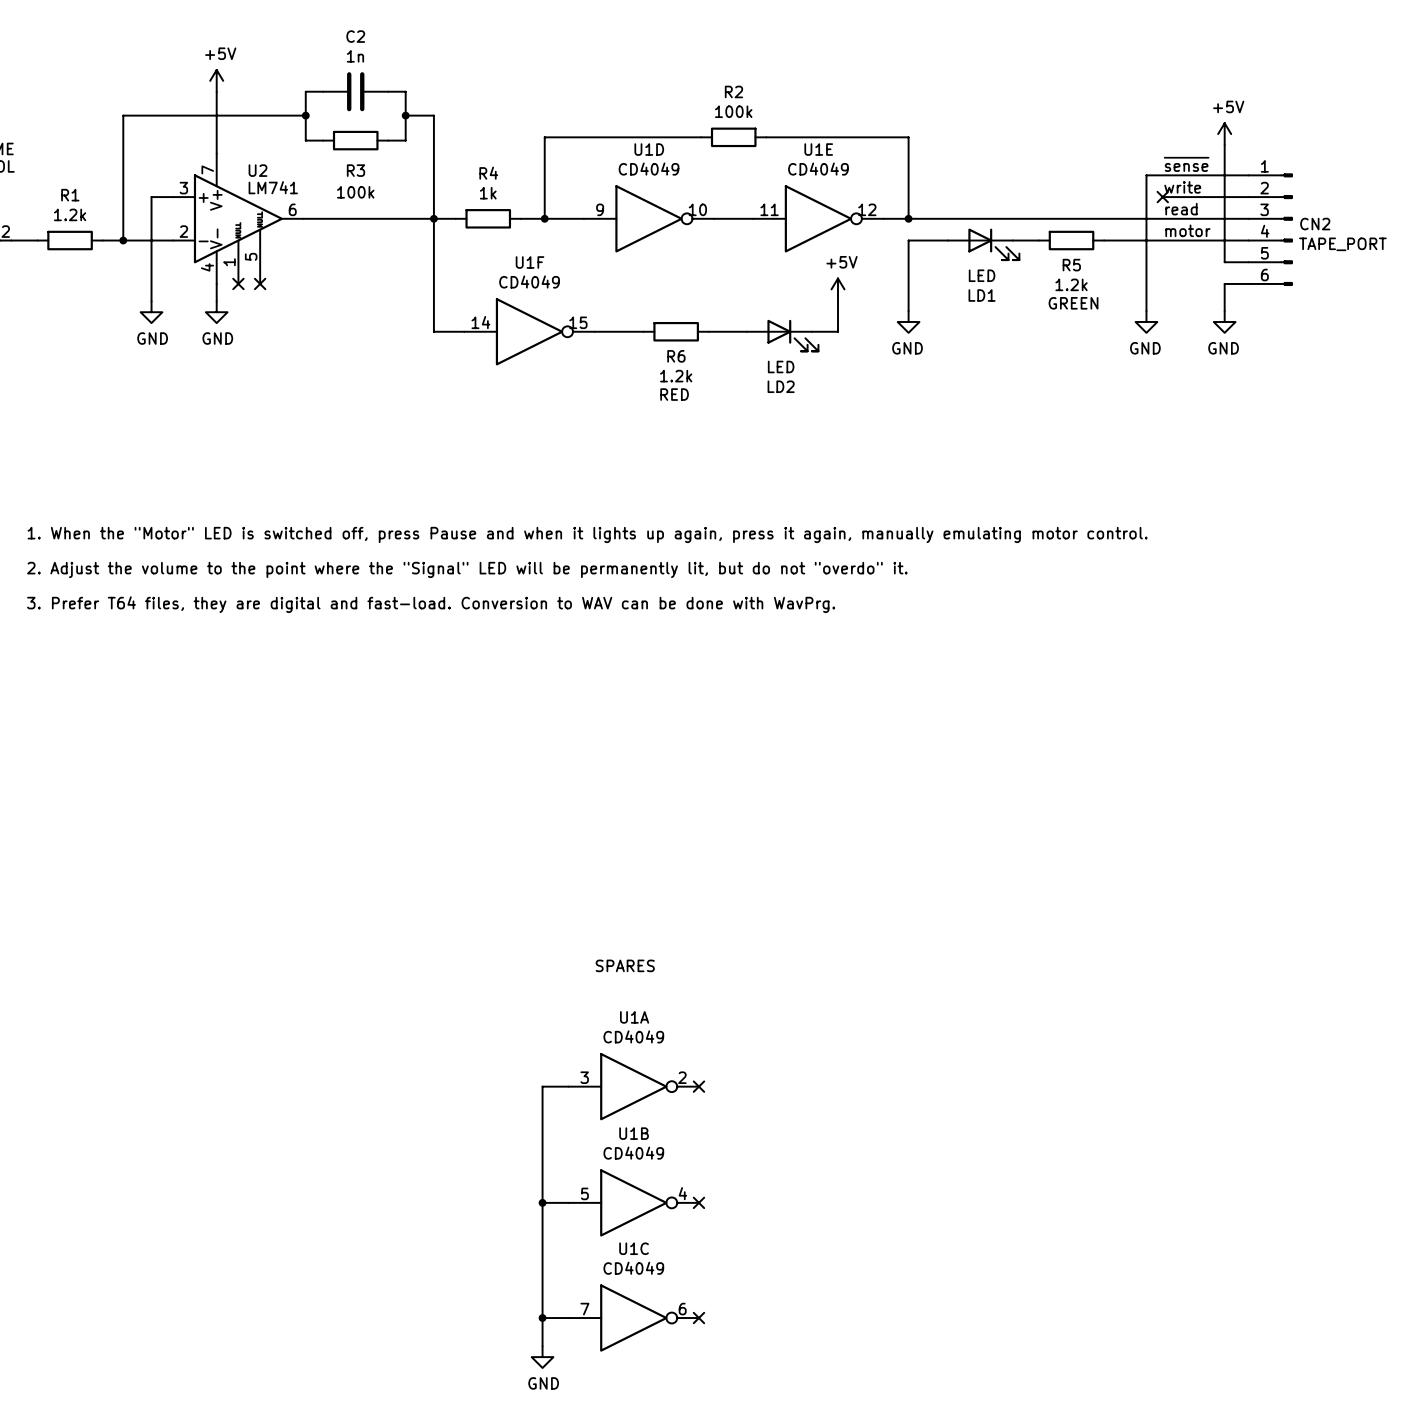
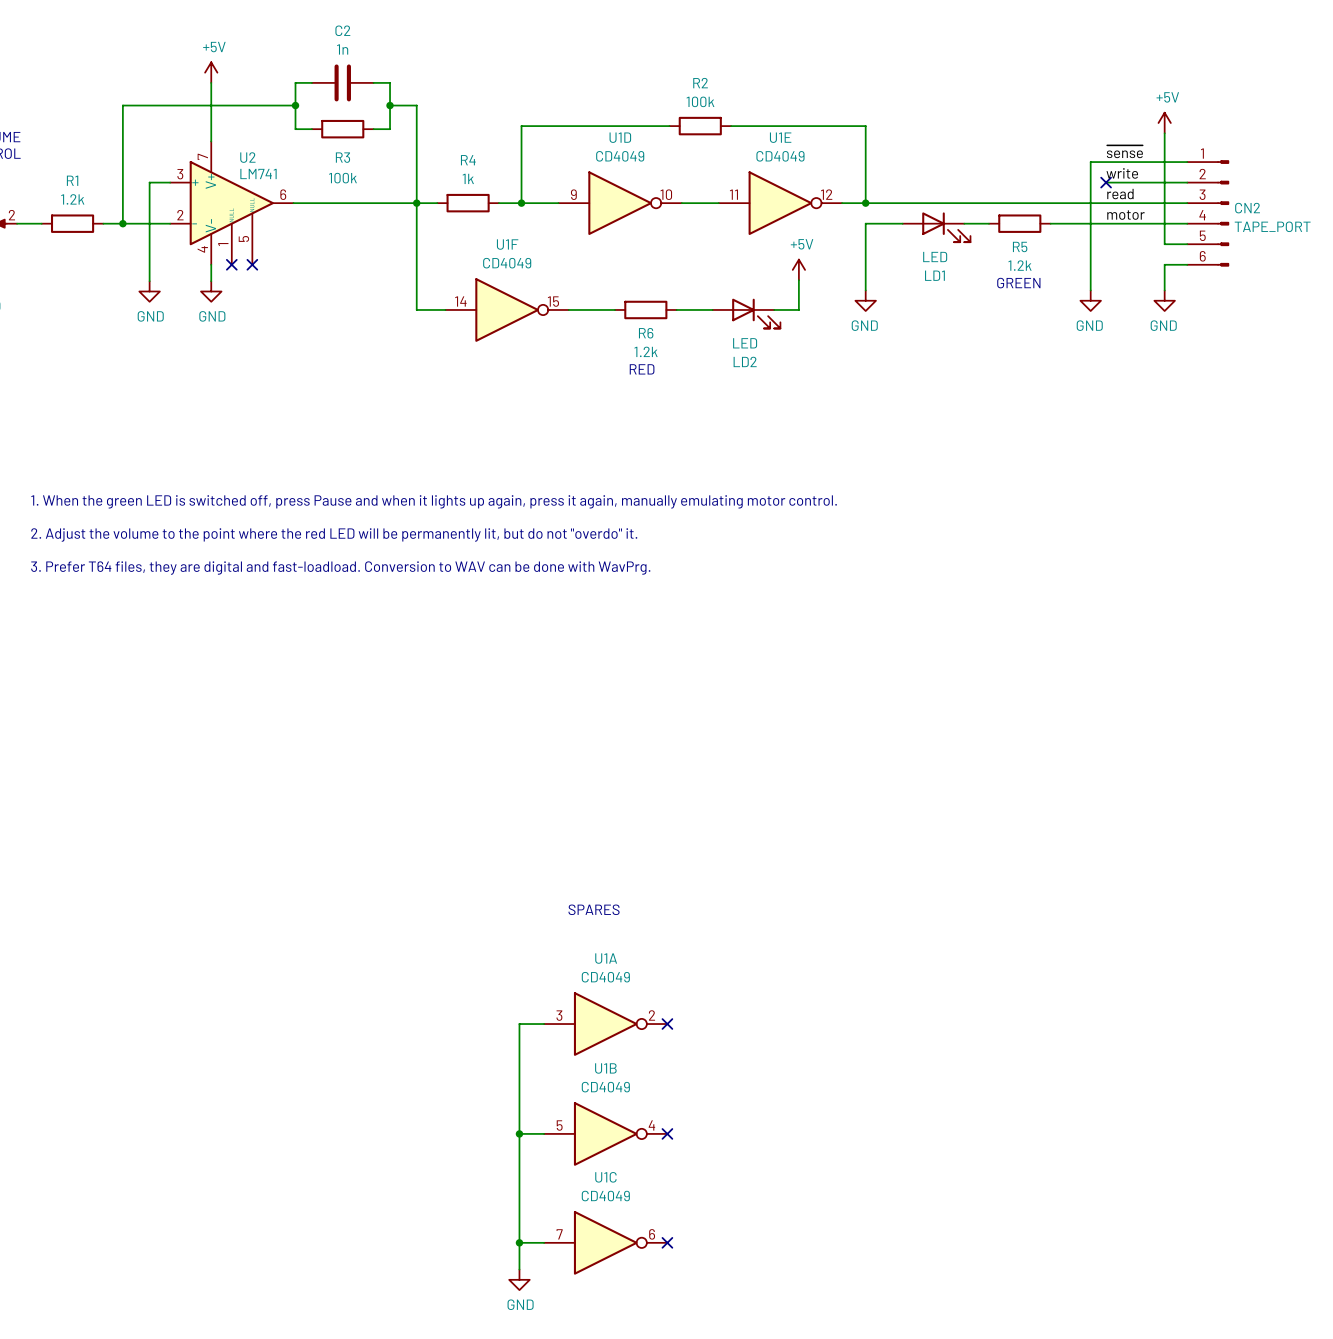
text: 1. When the "Motor" LED is switched off, press Pause and when it lights up again, press it again, manually emulating motor control. (587, 534) -> 1. When the green LED is switched off, press Pause and when it lights up again, press it again, manually emulating motor control. (434, 501)
text: 2. Adjust the volume to the point where the "Signal" LED will be permanently lit, but do not "overdo" it. (467, 569) -> 2. Adjust the volume to the point where the red LED will be permanently lit, but do not "overdo" it. (334, 535)
text: 3. Prefer T64 files, they are digital and fast-load. Conversion to WAV can be done with WavPrg. (431, 604) -> 3. Prefer T64 files, they are digital and fast-loadload. Conversion to WAV can be done with WavPrg. (340, 568)

